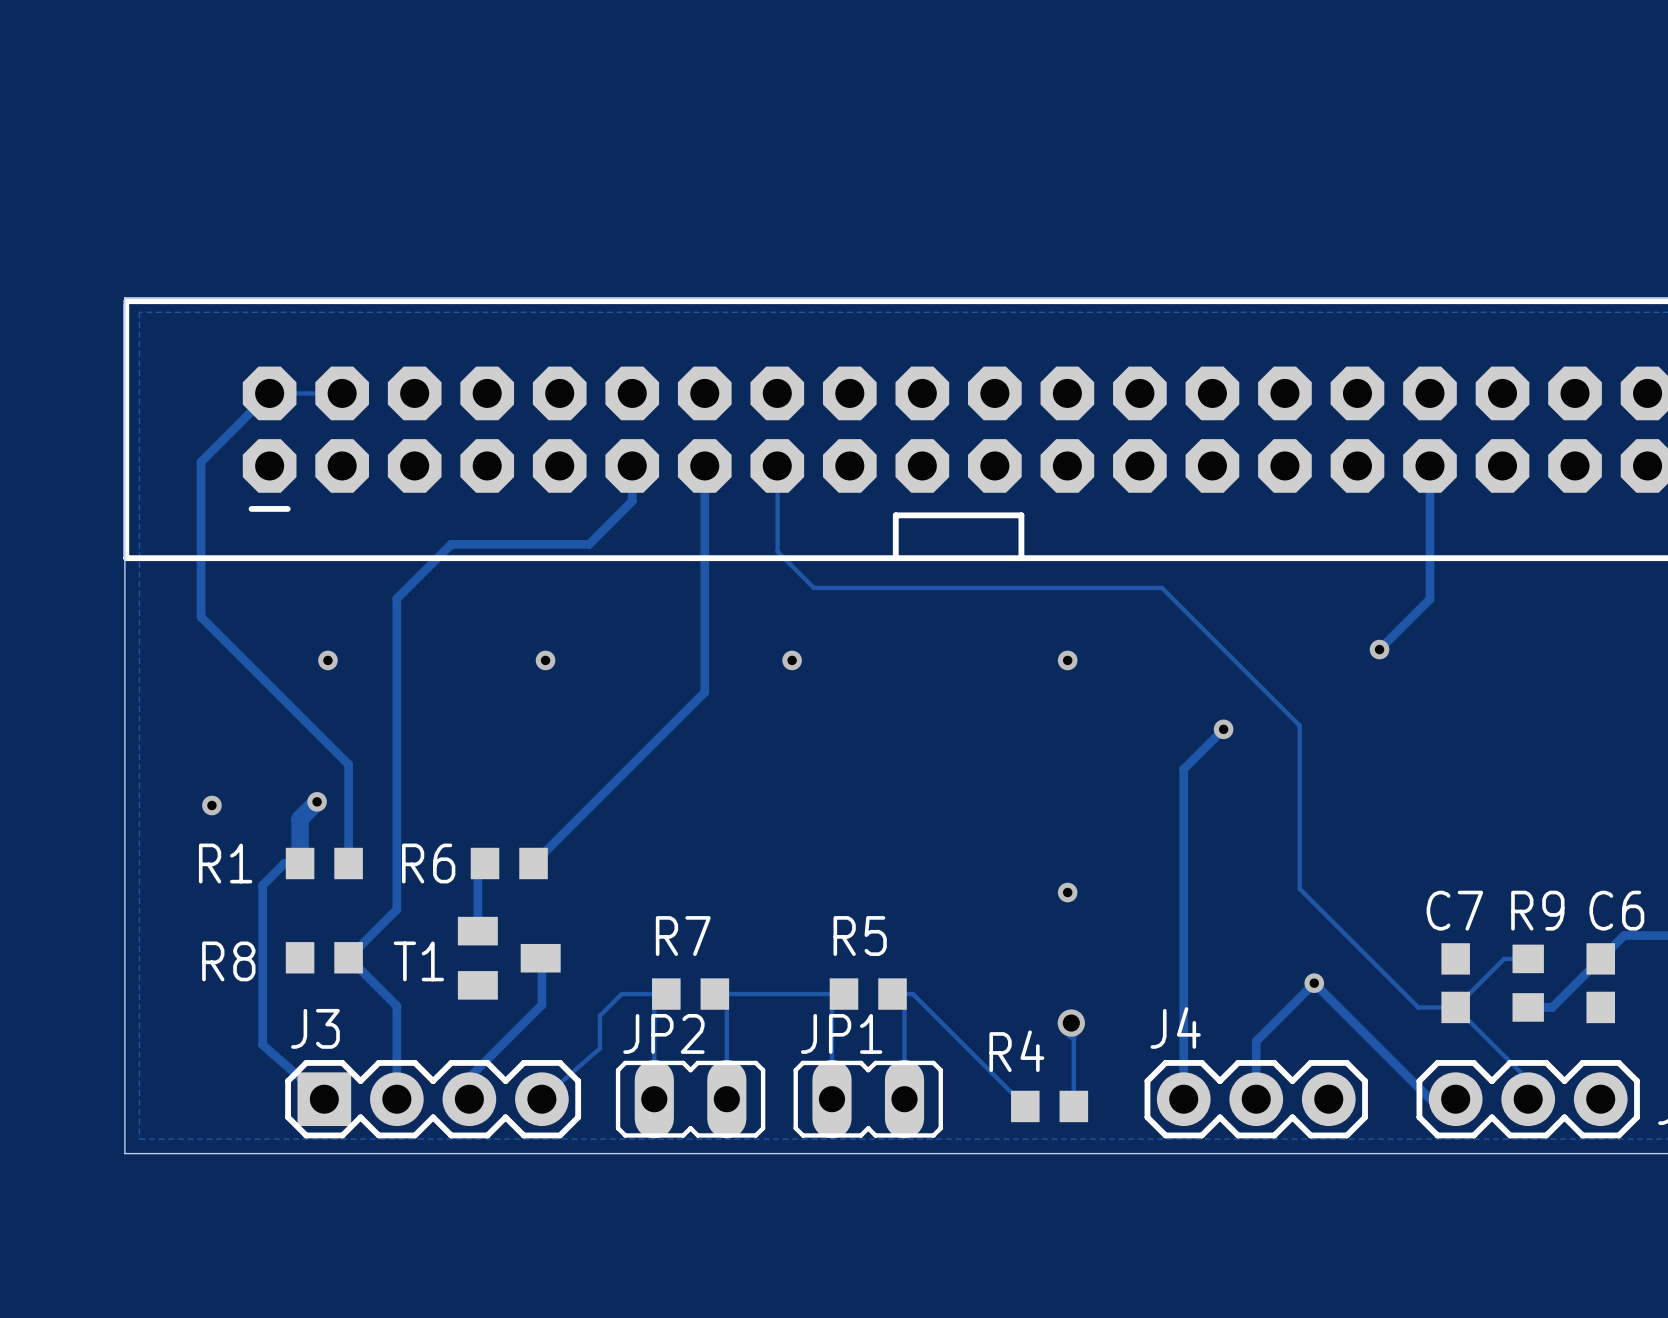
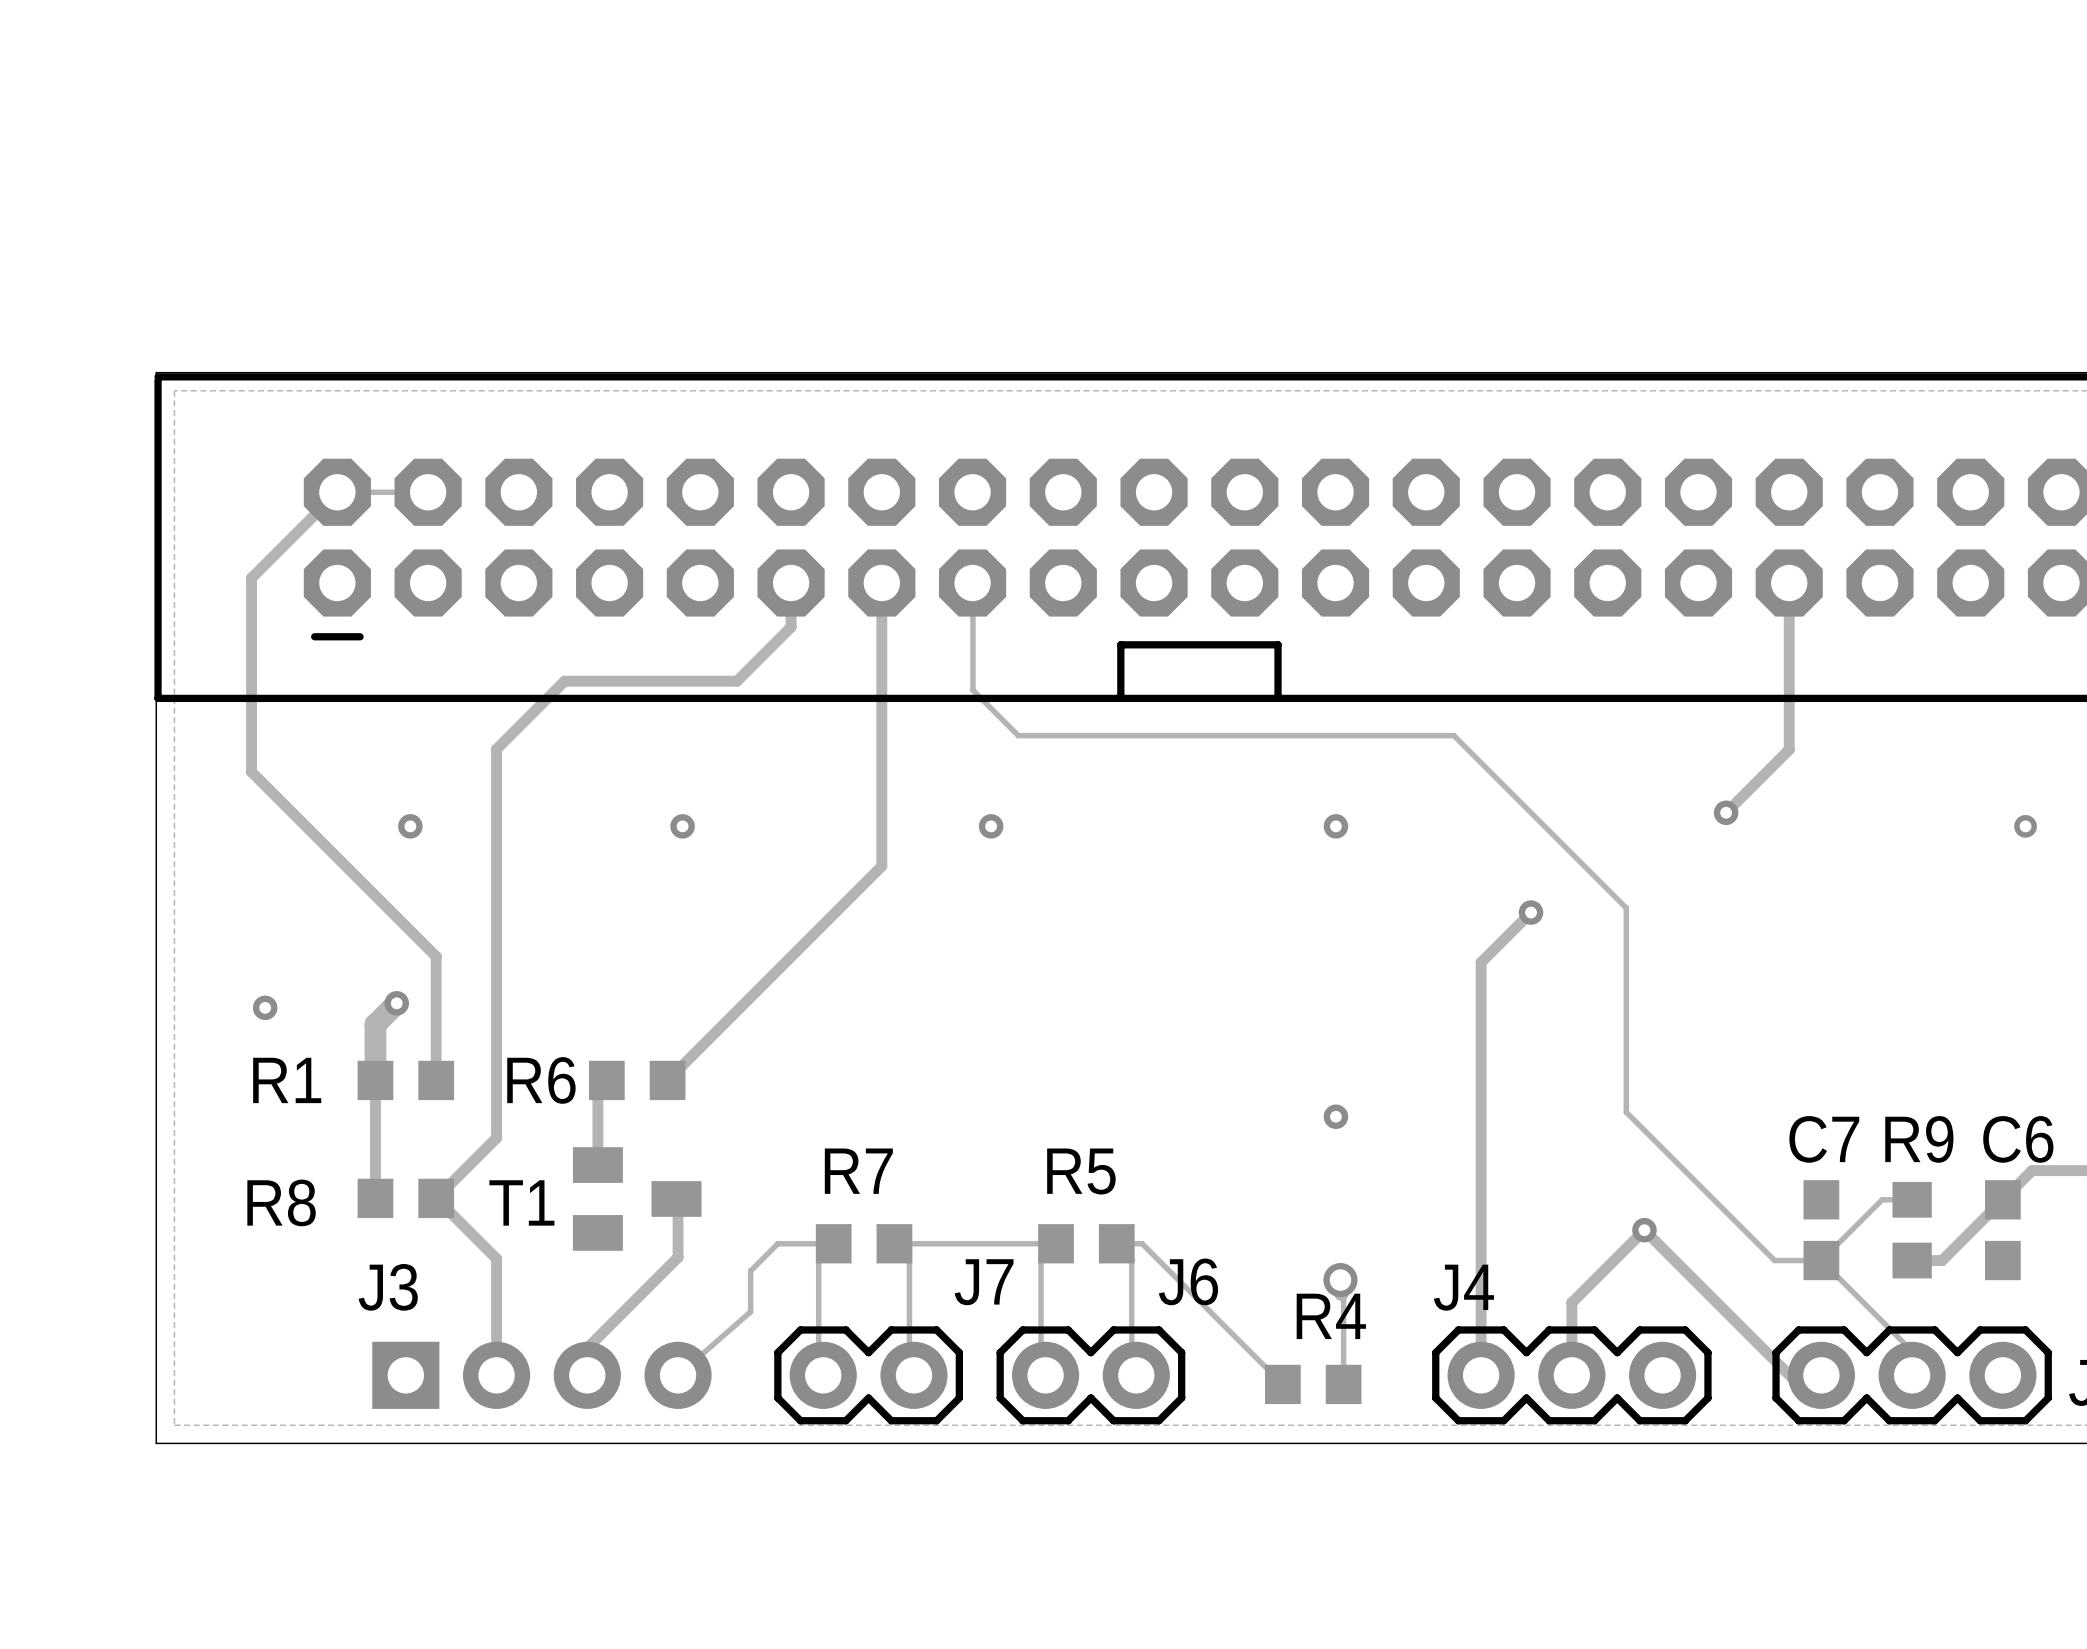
via: none -> (2025, 826)
track: (300, 863) (284, 863) (262, 885) (262, 1044) (324, 1099) -> (375, 1080) (375, 1198)
R4 name position: R4 (1016, 1051) -> R4 (1331, 1316)
J3 footprint: [285, 1060, 582, 1139] -> [372, 1341, 712, 1409]
JP2: (690, 1099) -> none
J7: none -> (868, 1375)
JP1: (868, 1099) -> none
J6: none -> (1090, 1375)

